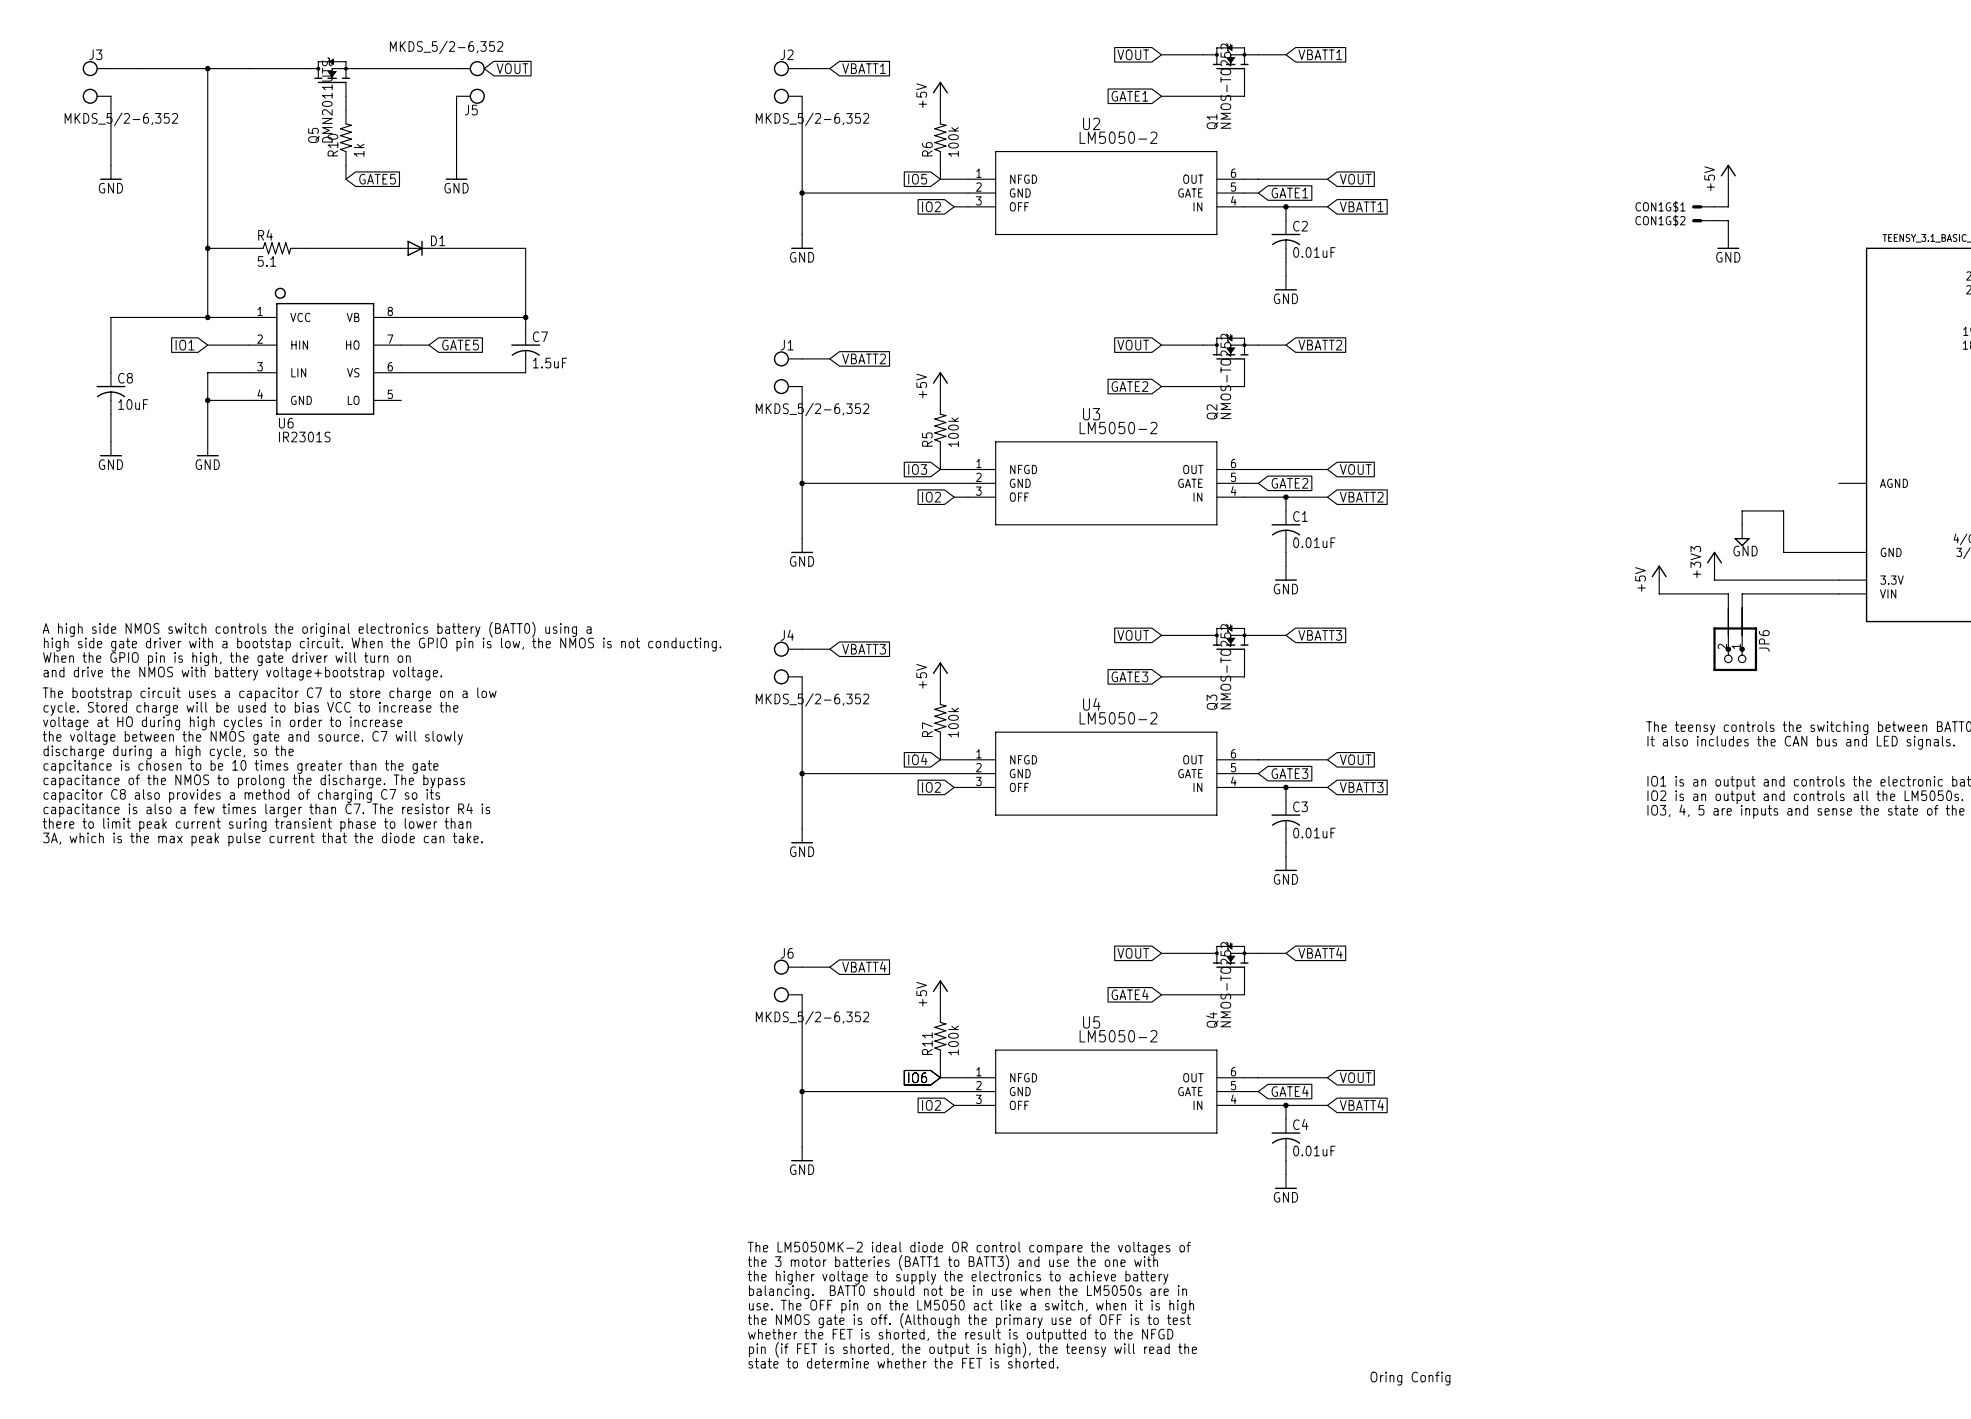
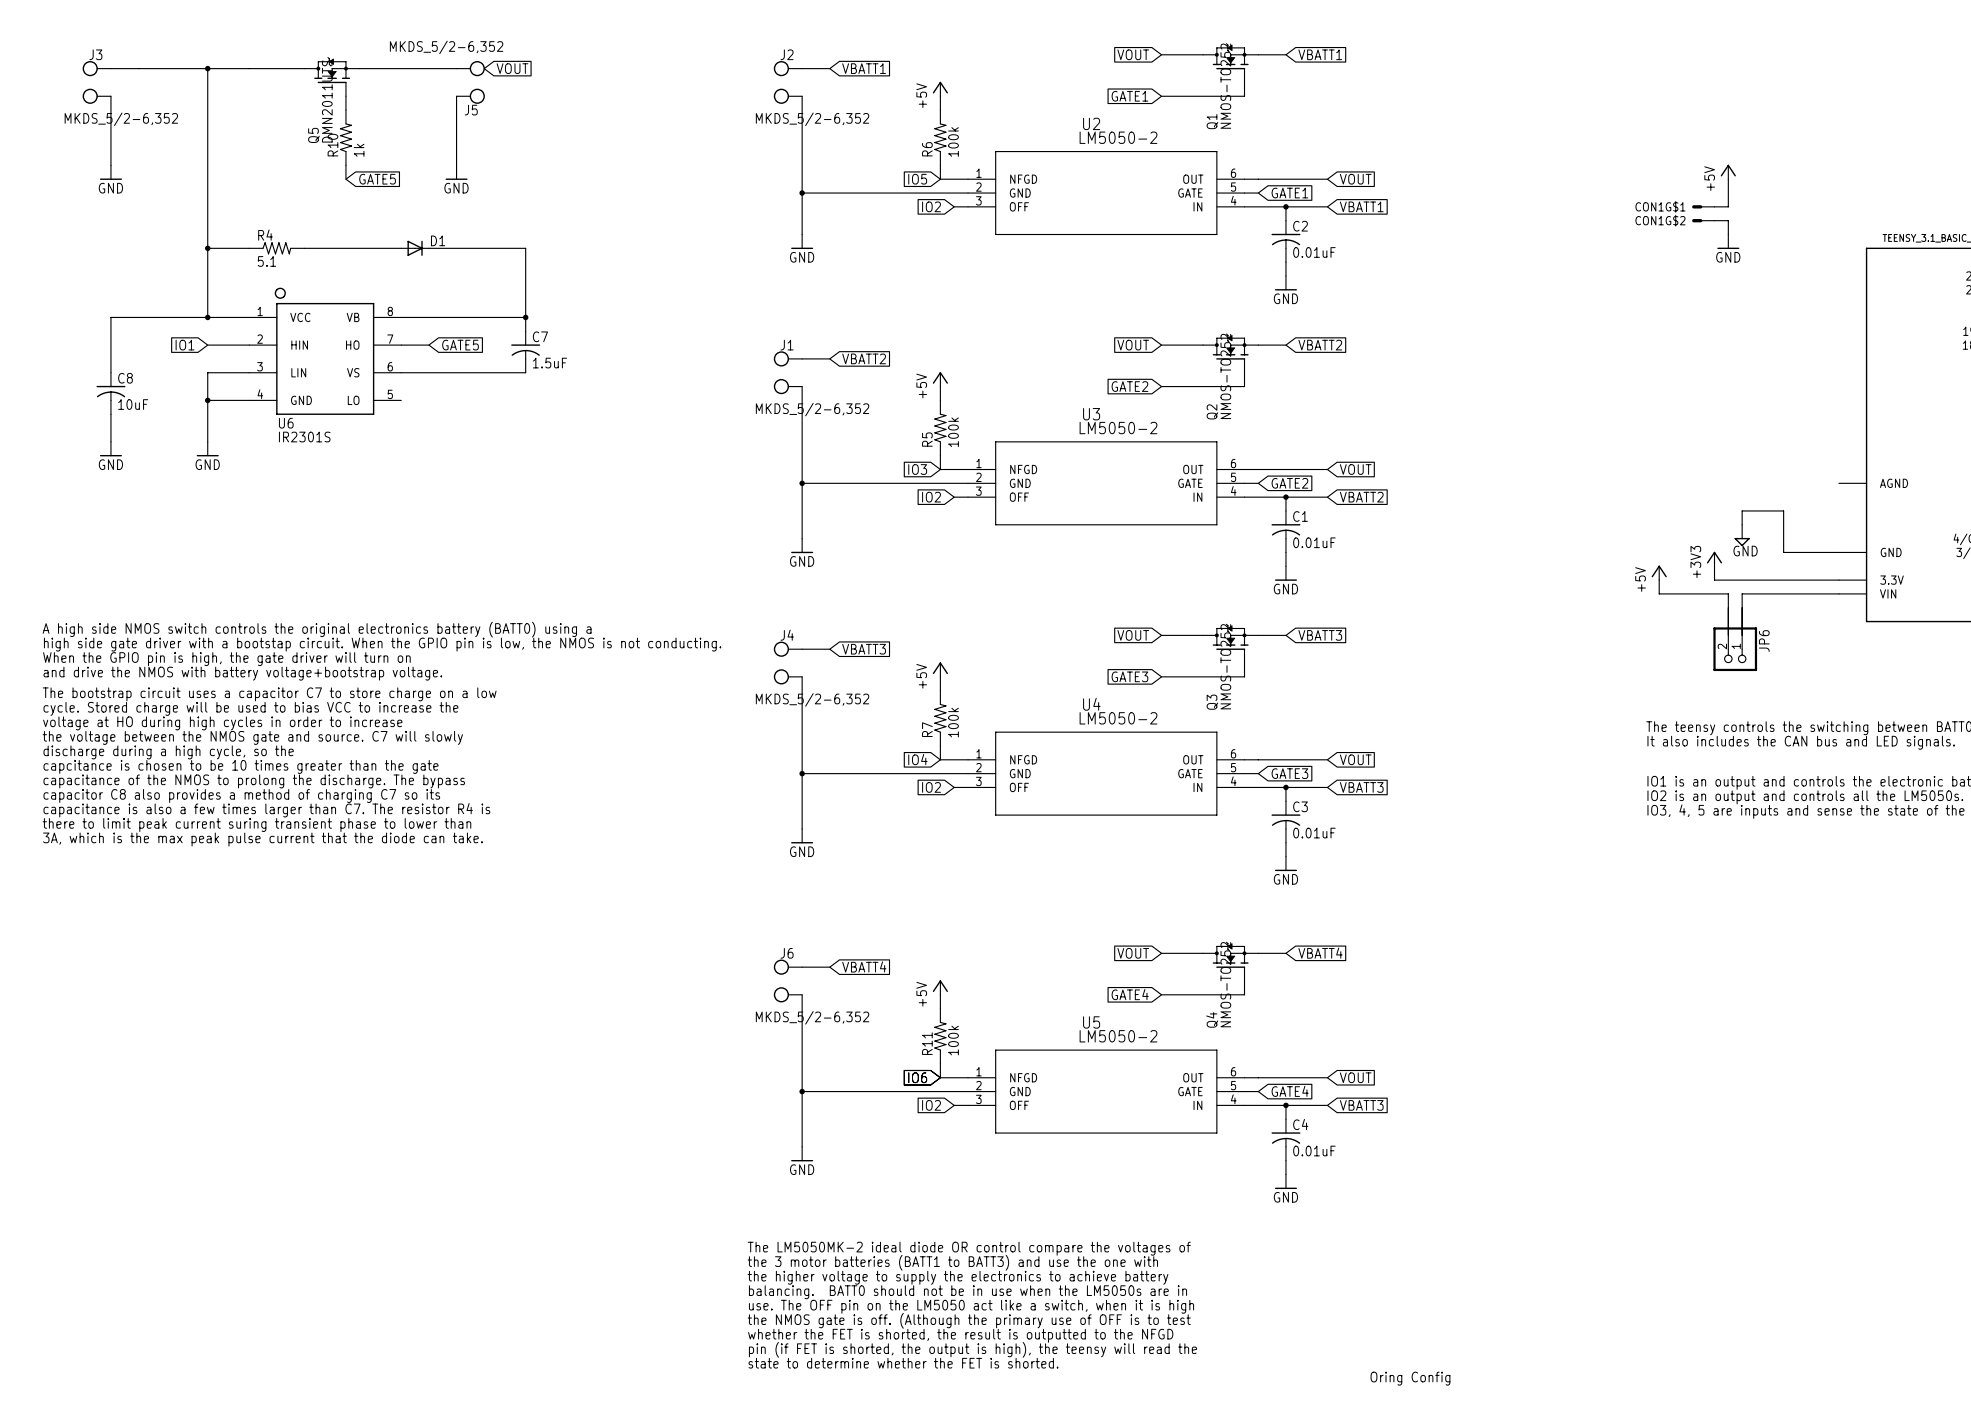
junction: (1728, 649) -> none
junction: (1742, 649) -> none
global label: VBATT4 (1361, 1105) -> VBATT3 (1361, 1105)

